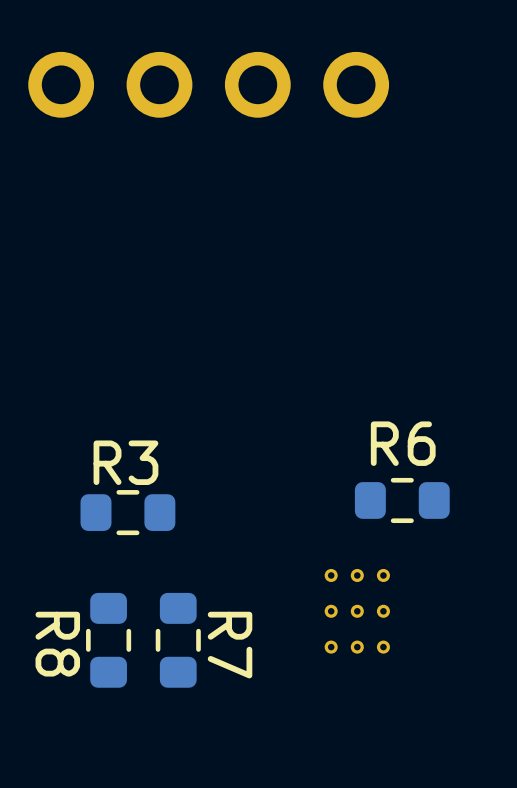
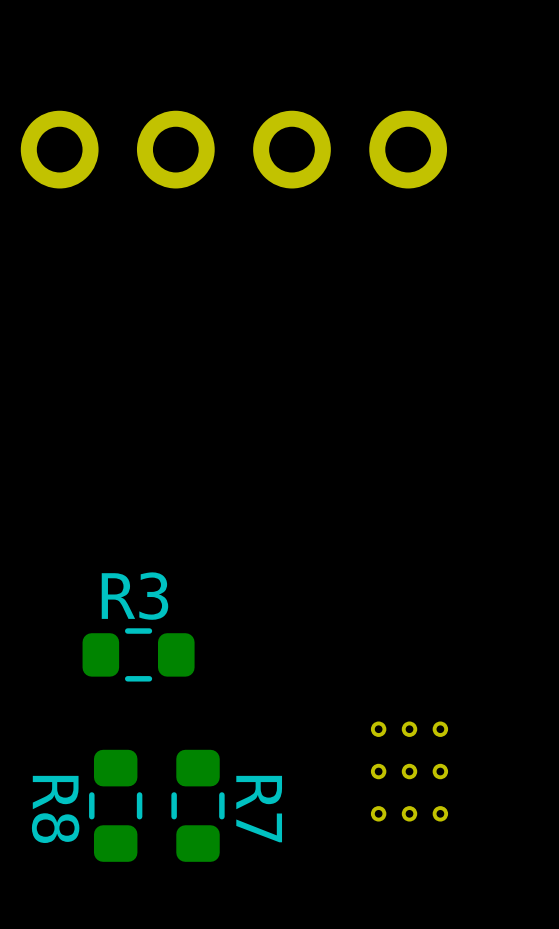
R6: (402, 500) -> none

